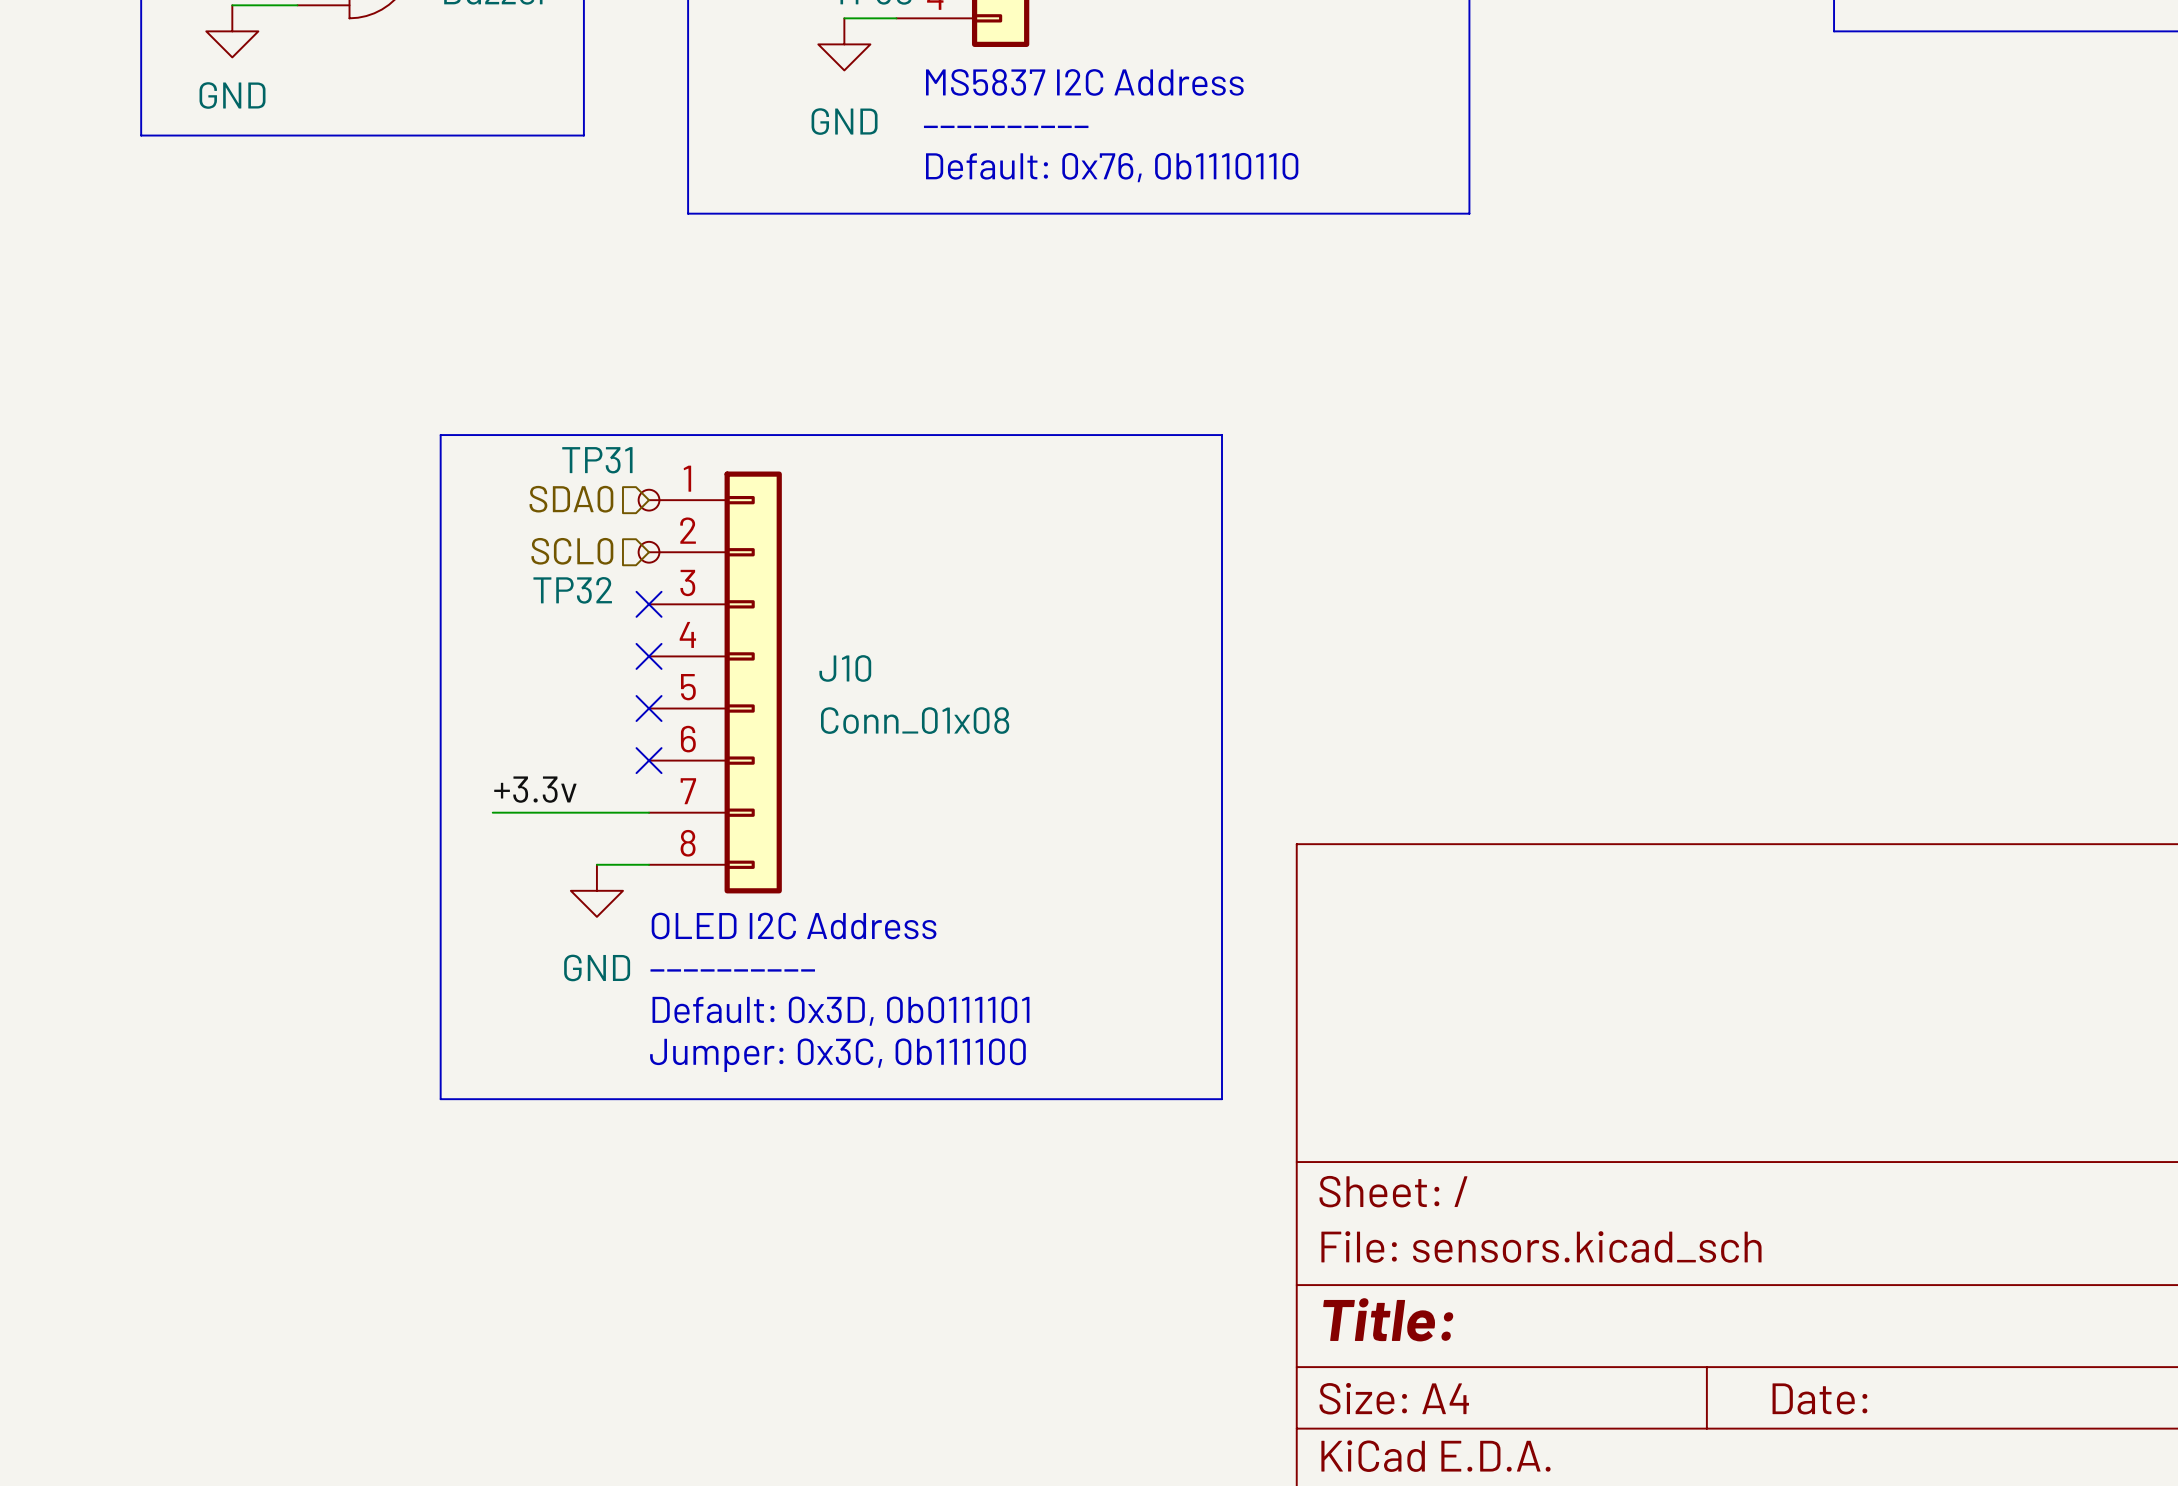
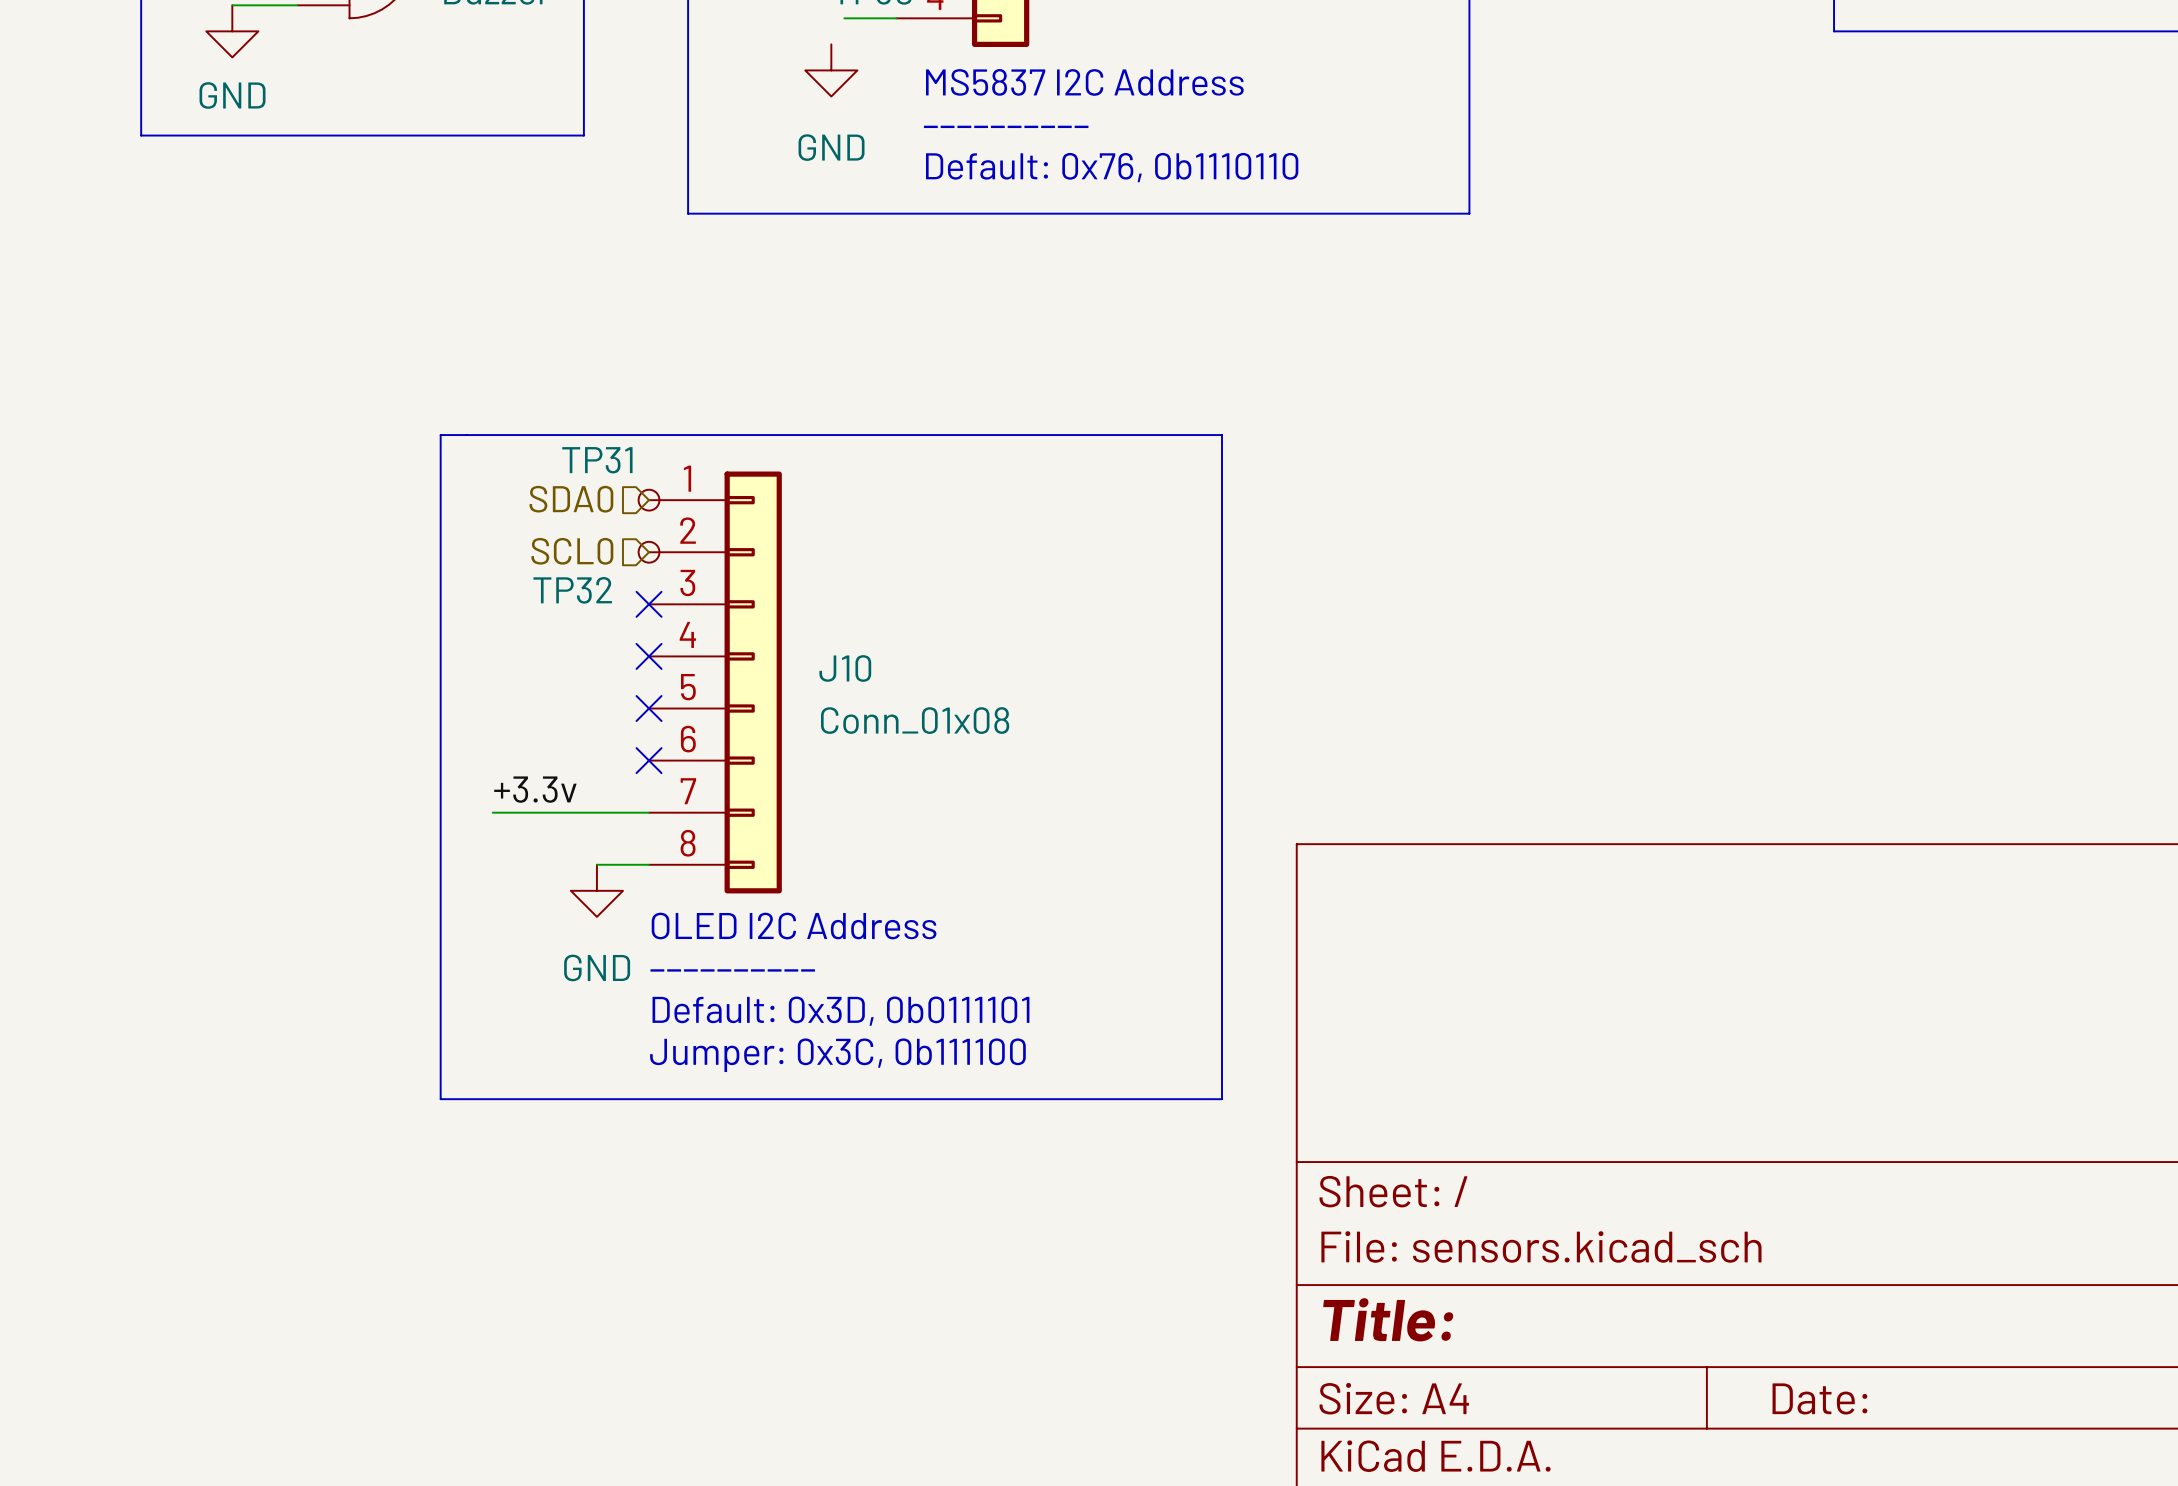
power symbol position: GND (844, 44) -> GND (831, 70)

